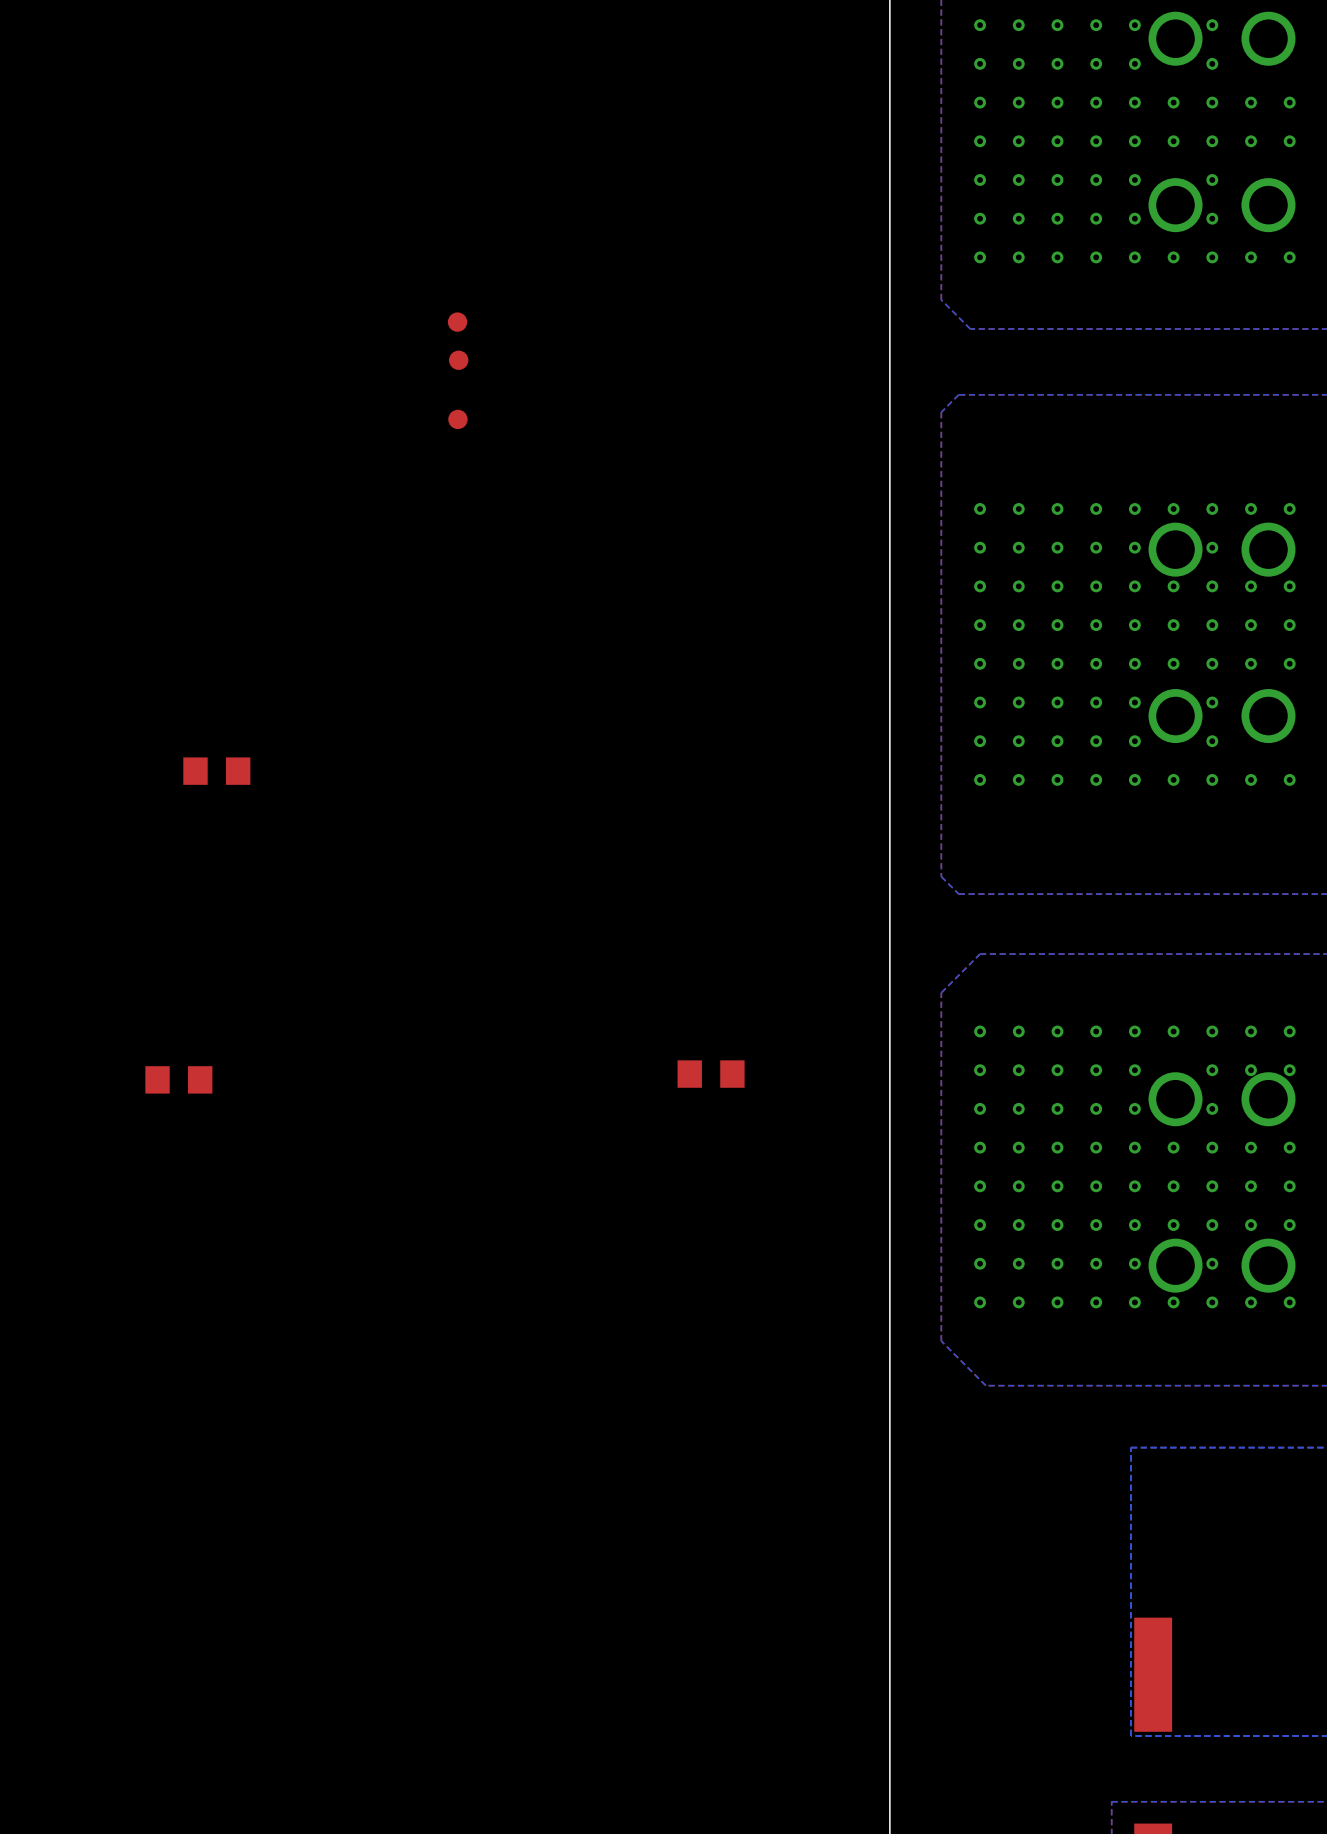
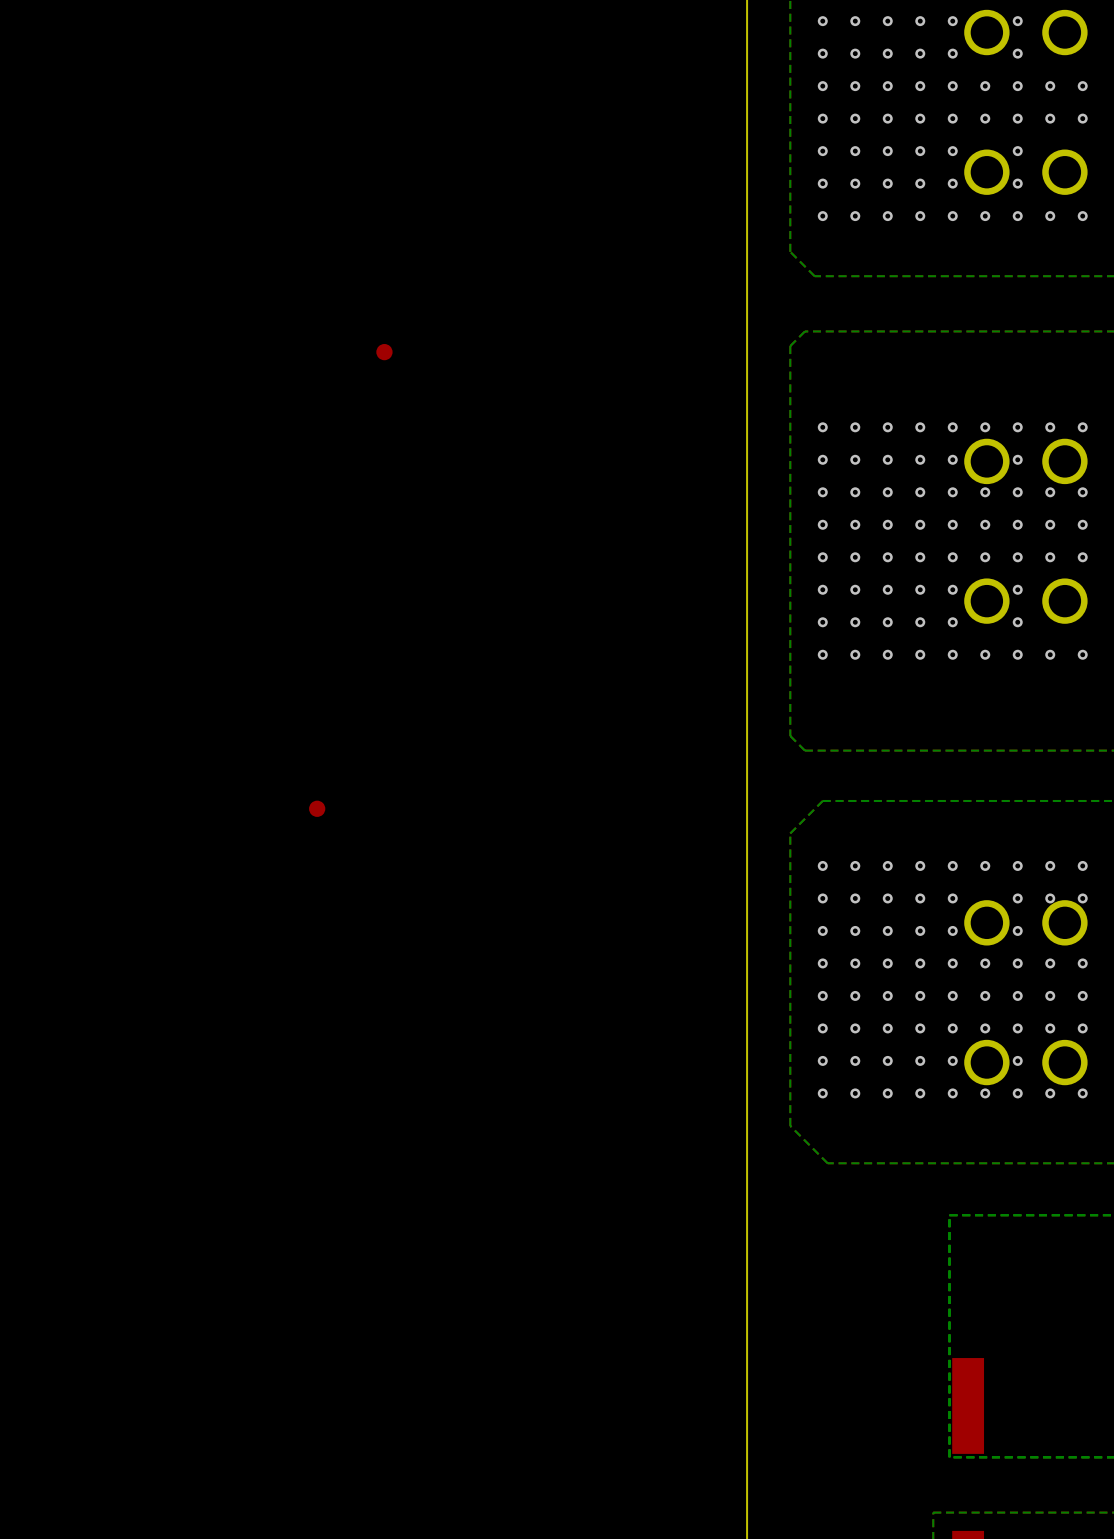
part: (457, 322) -> none
part: (458, 360) -> none
part: (216, 771) -> none
part: none -> (317, 808)
part: (711, 1074) -> none
part: (178, 1079) -> none

